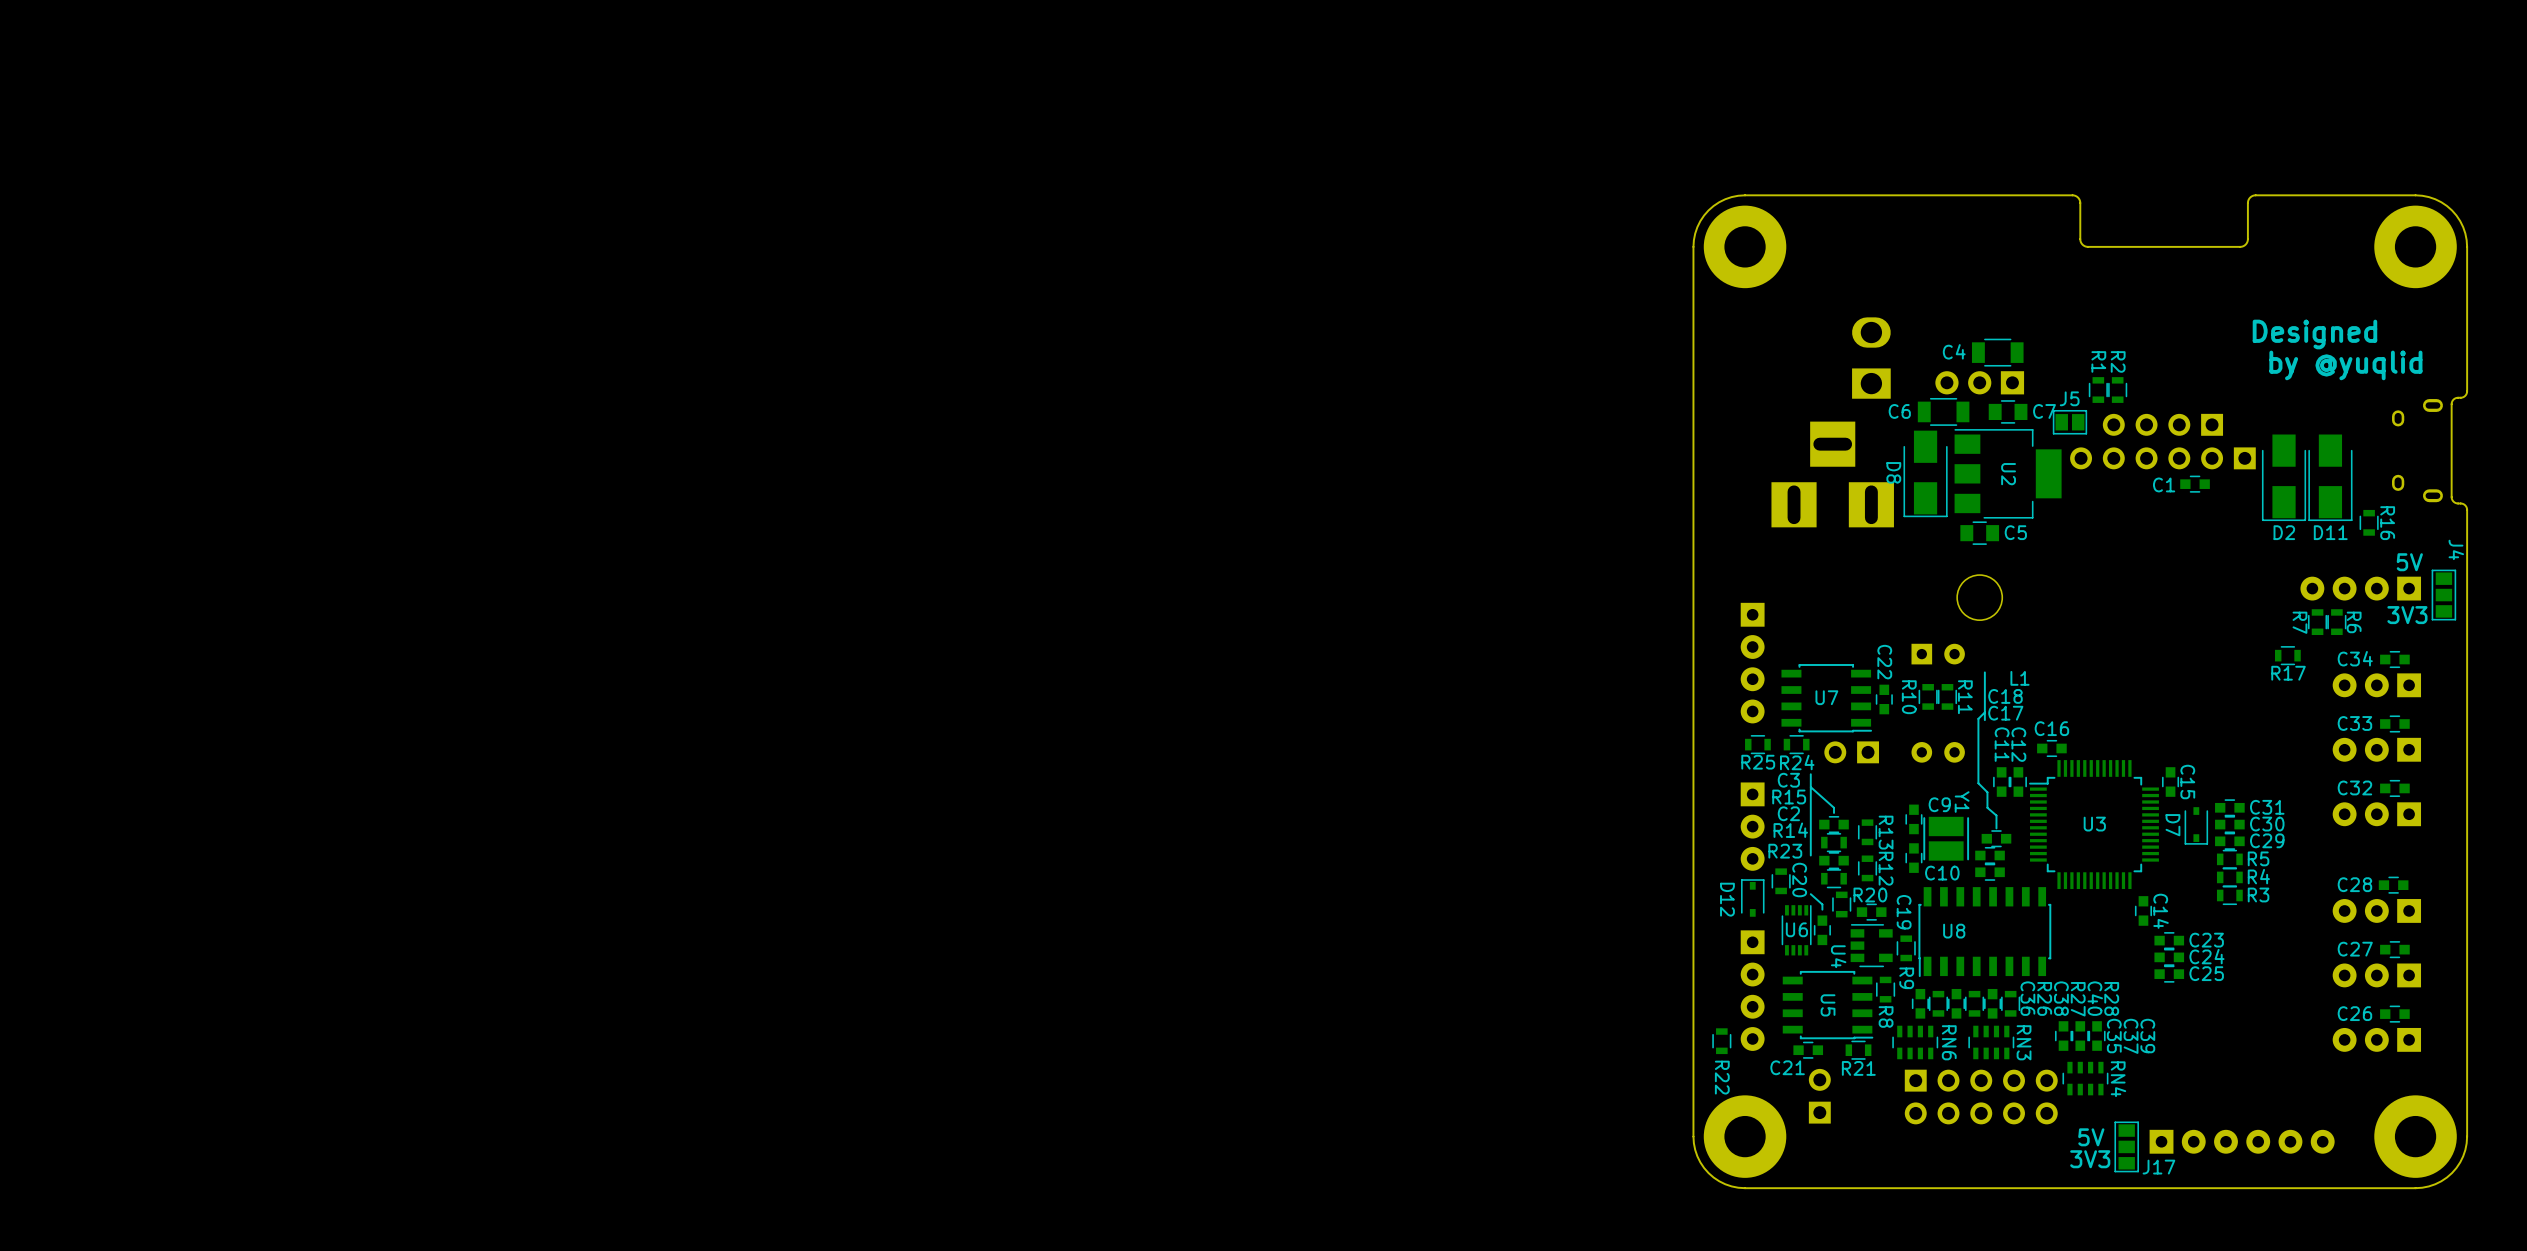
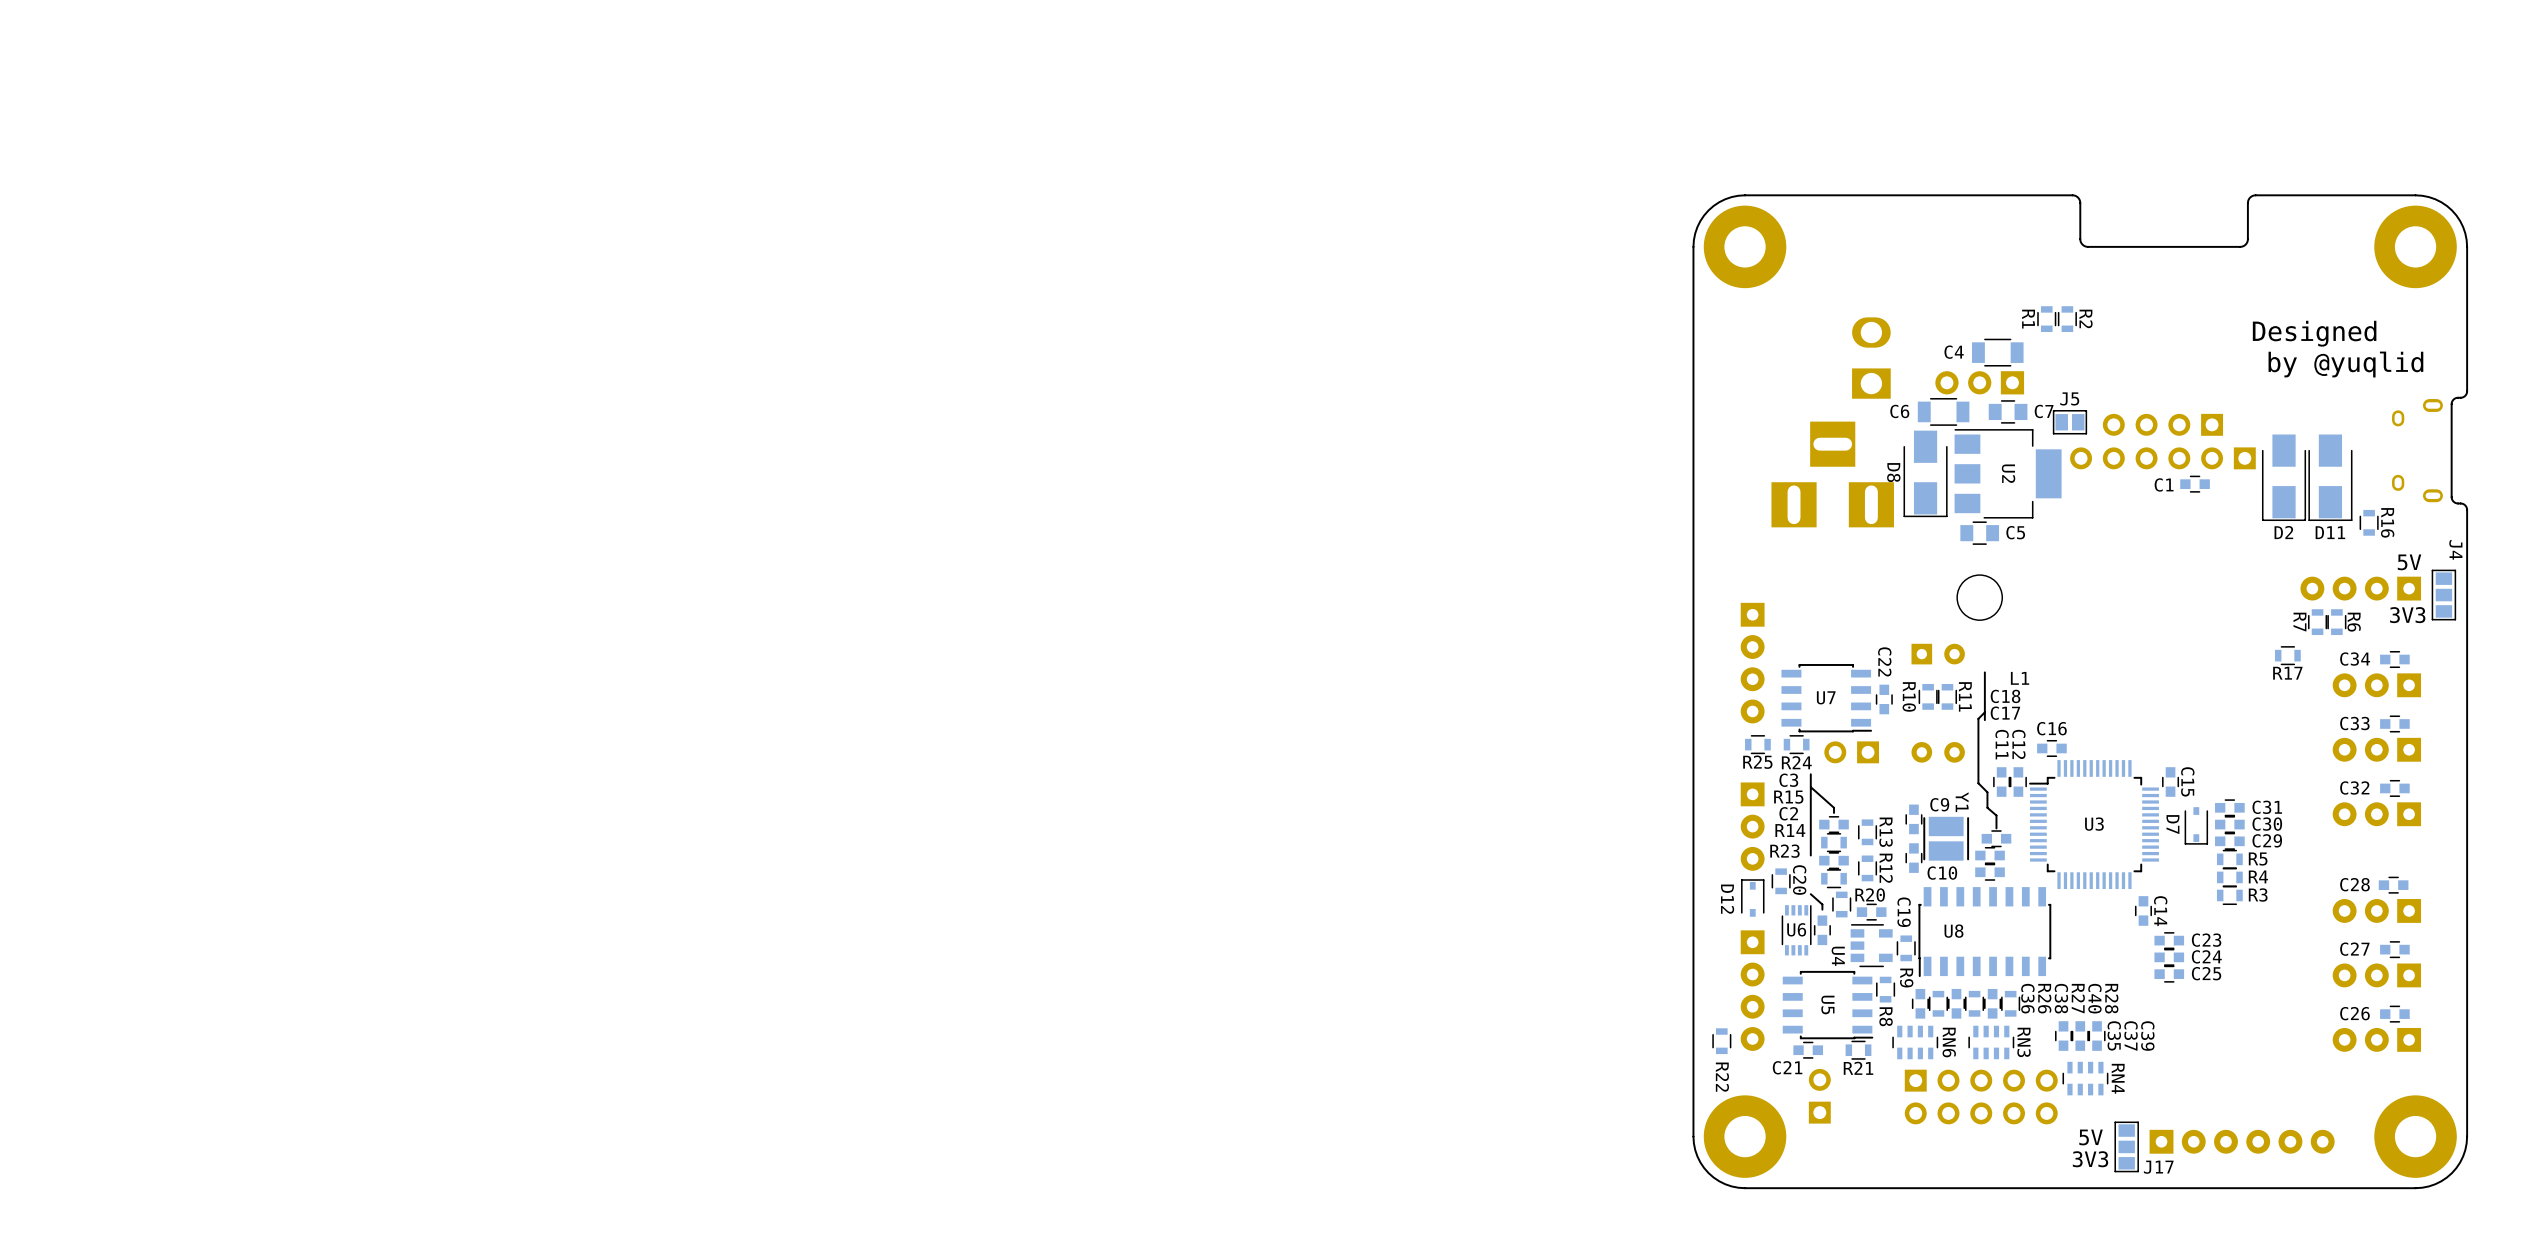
R1 name position: R1 (2098, 361) -> R1 (2028, 319)
R2 name position: R2 (2118, 361) -> R2 (2086, 318)
R1 position: (2098, 390) -> (2046, 319)
R2 position: (2117, 390) -> (2067, 319)

